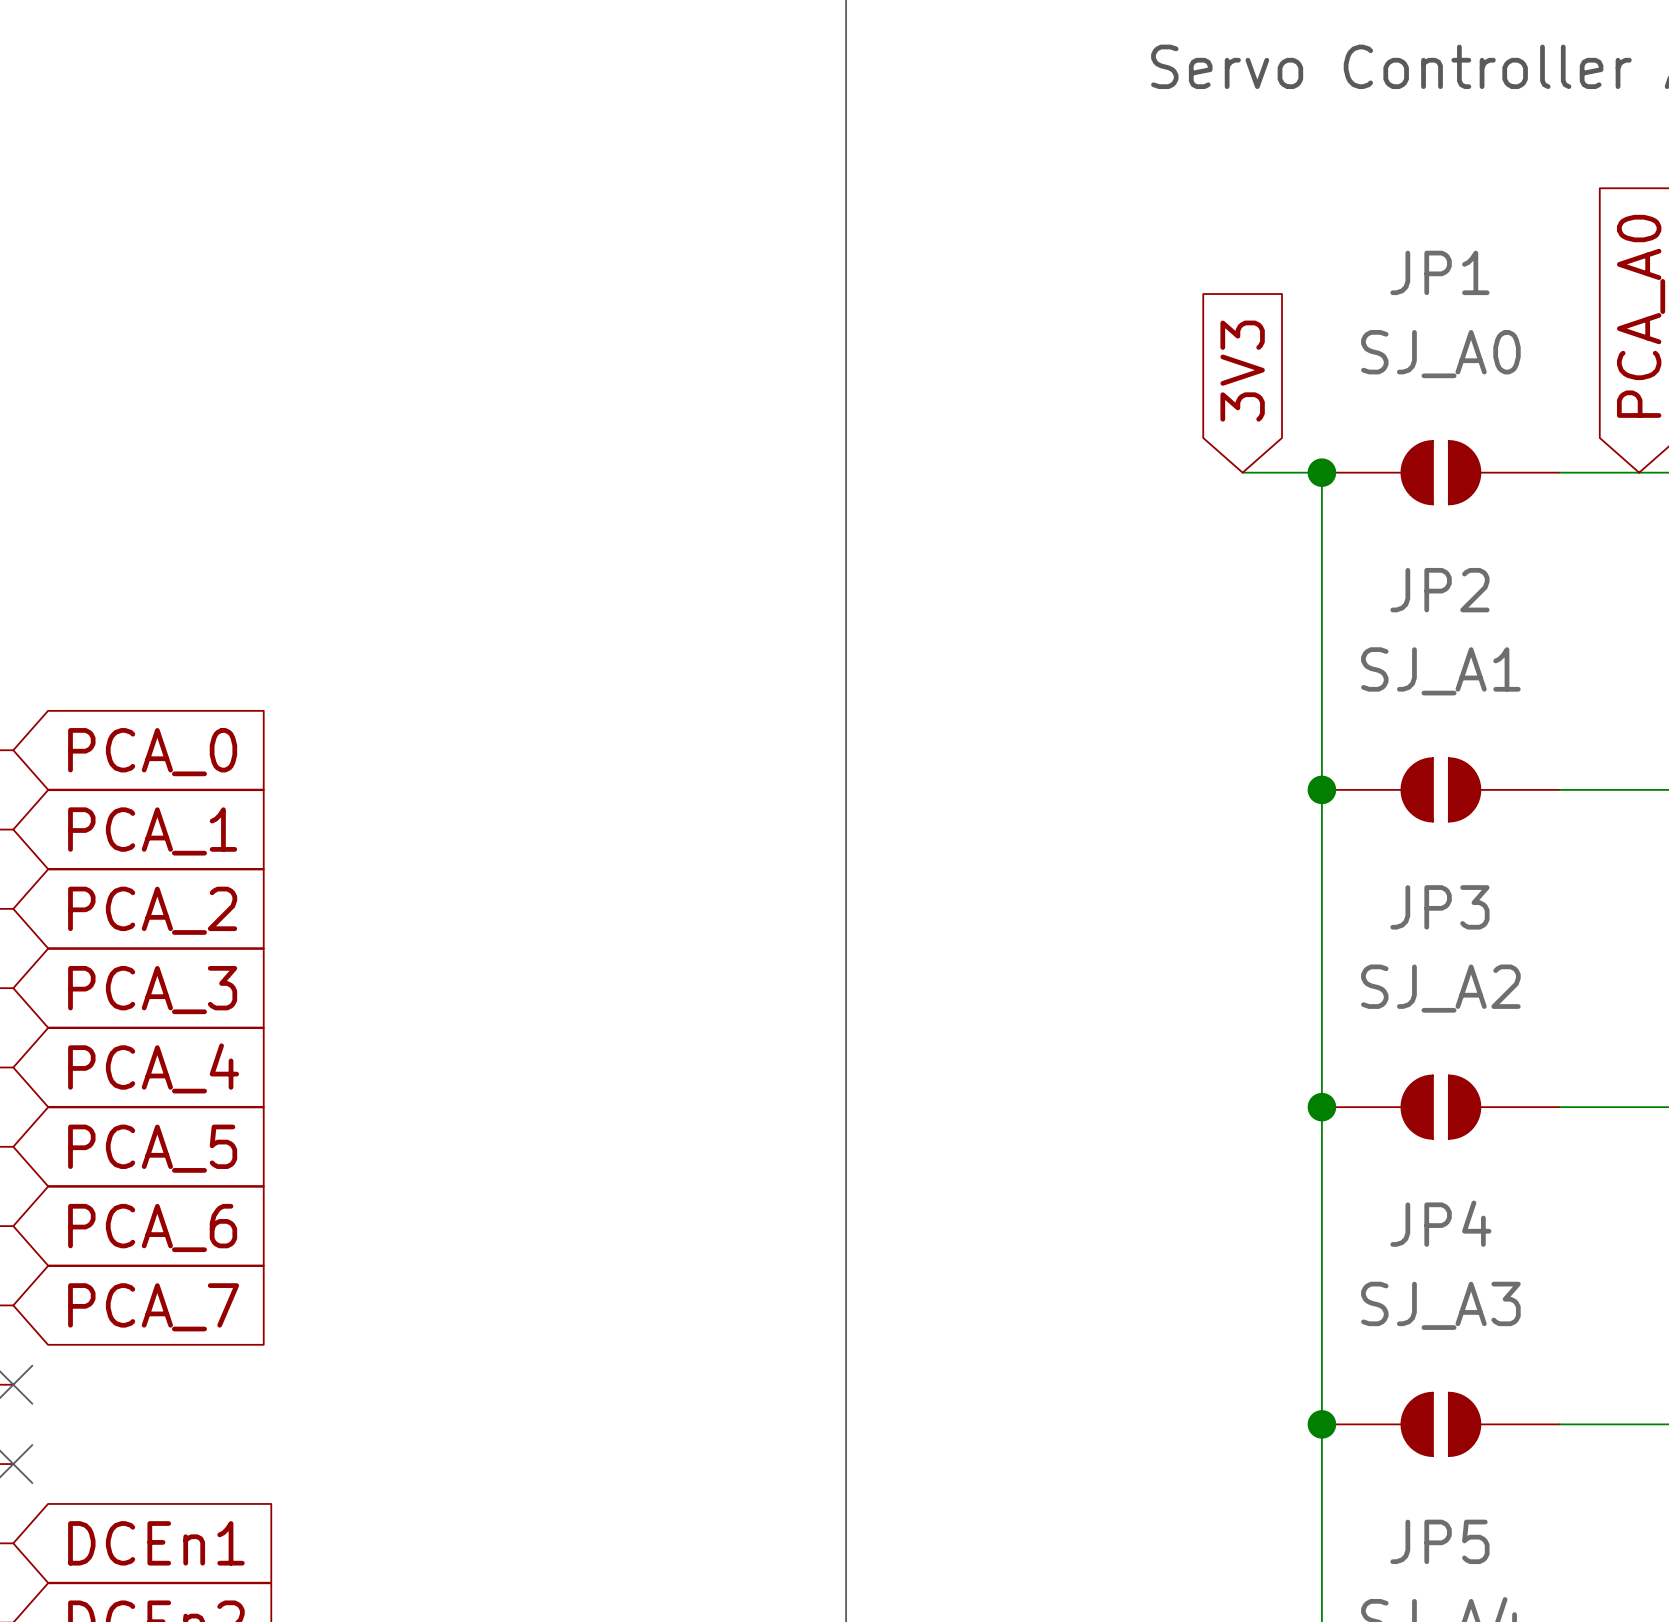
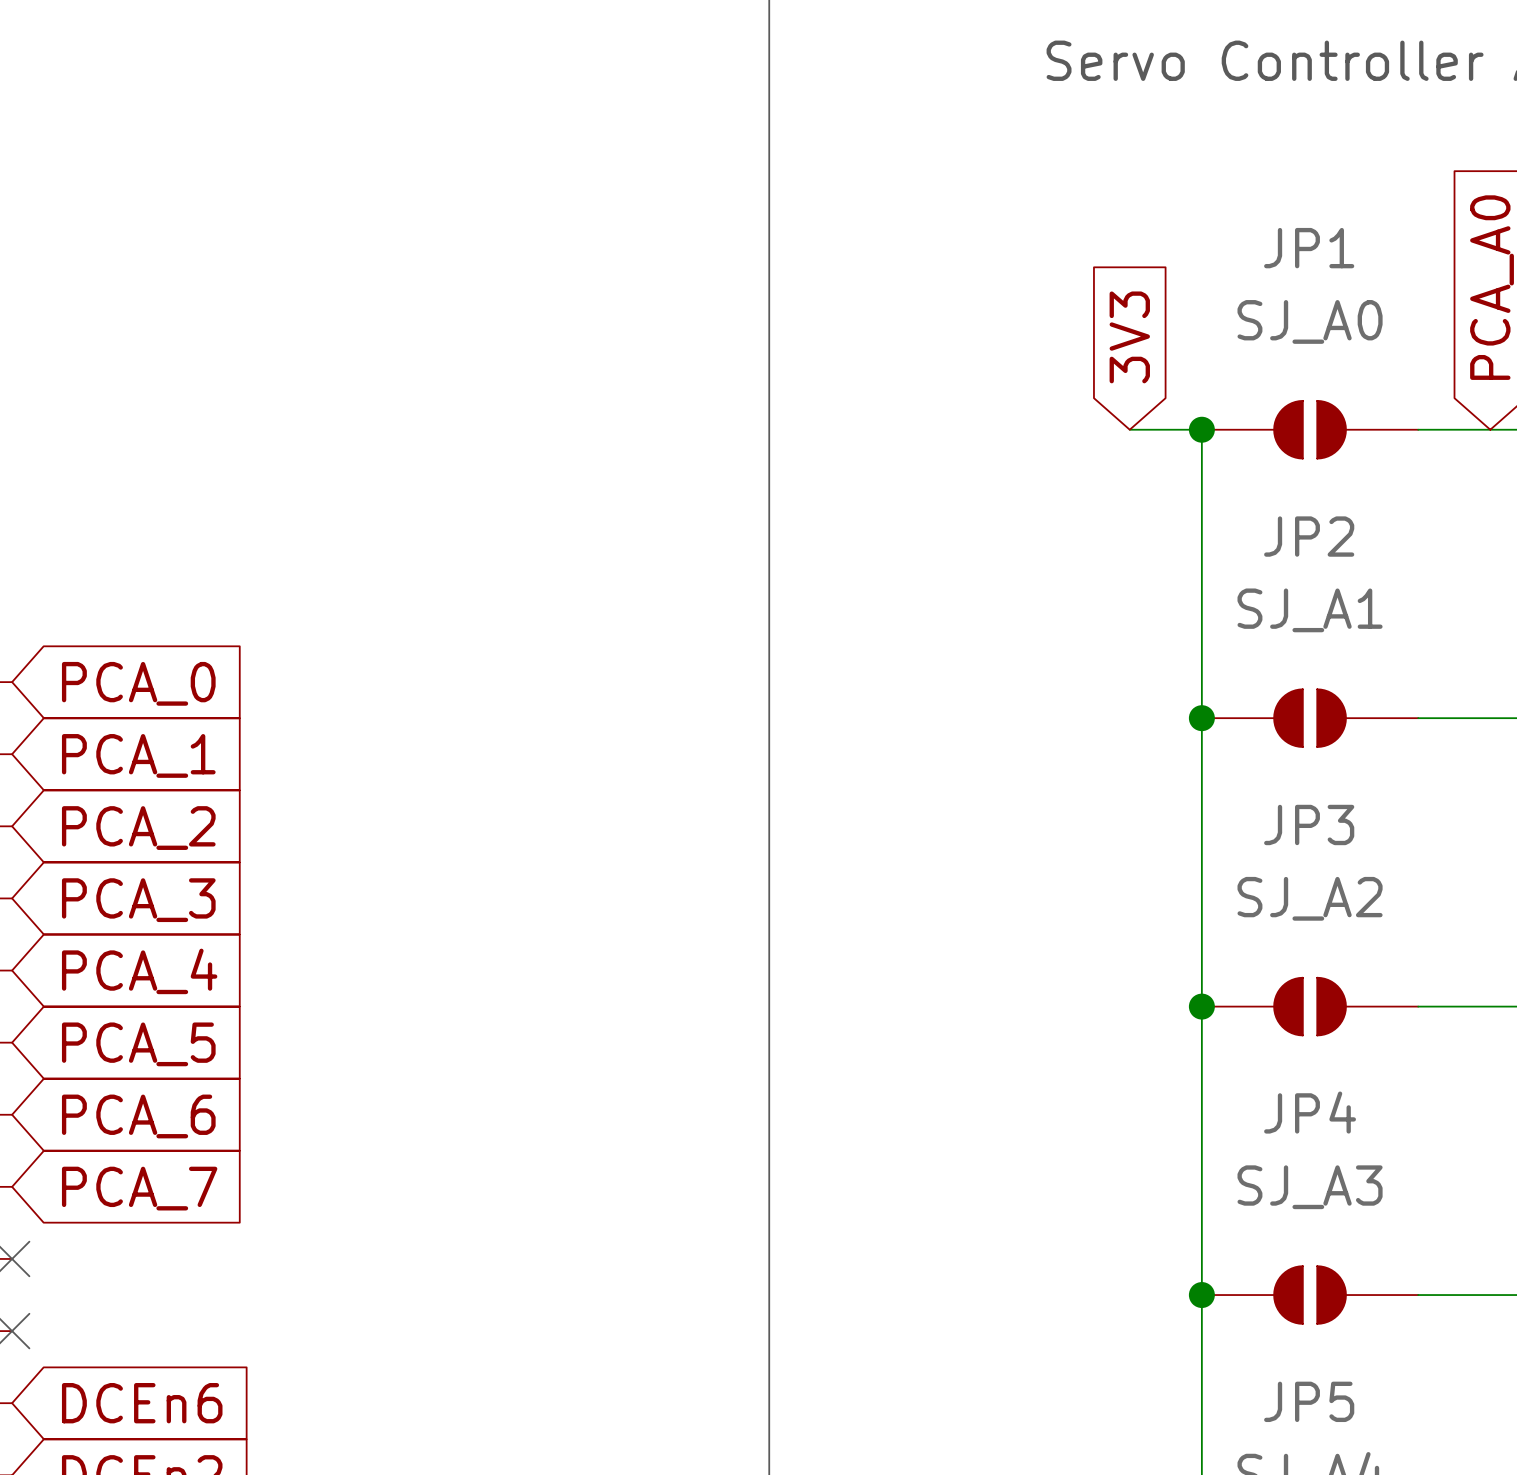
global label: DCEn1 (156, 1543) -> DCEn6 (142, 1403)

